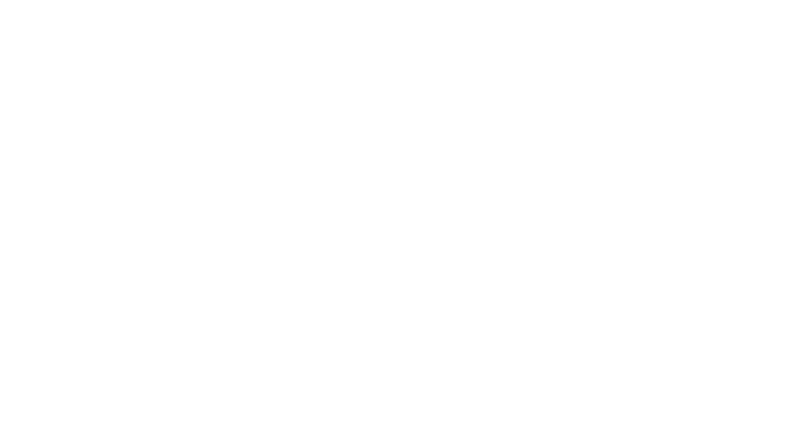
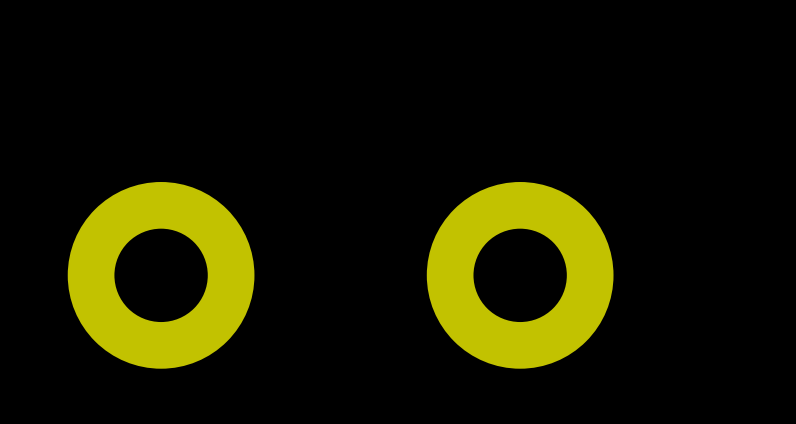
part: none -> (340, 275)

